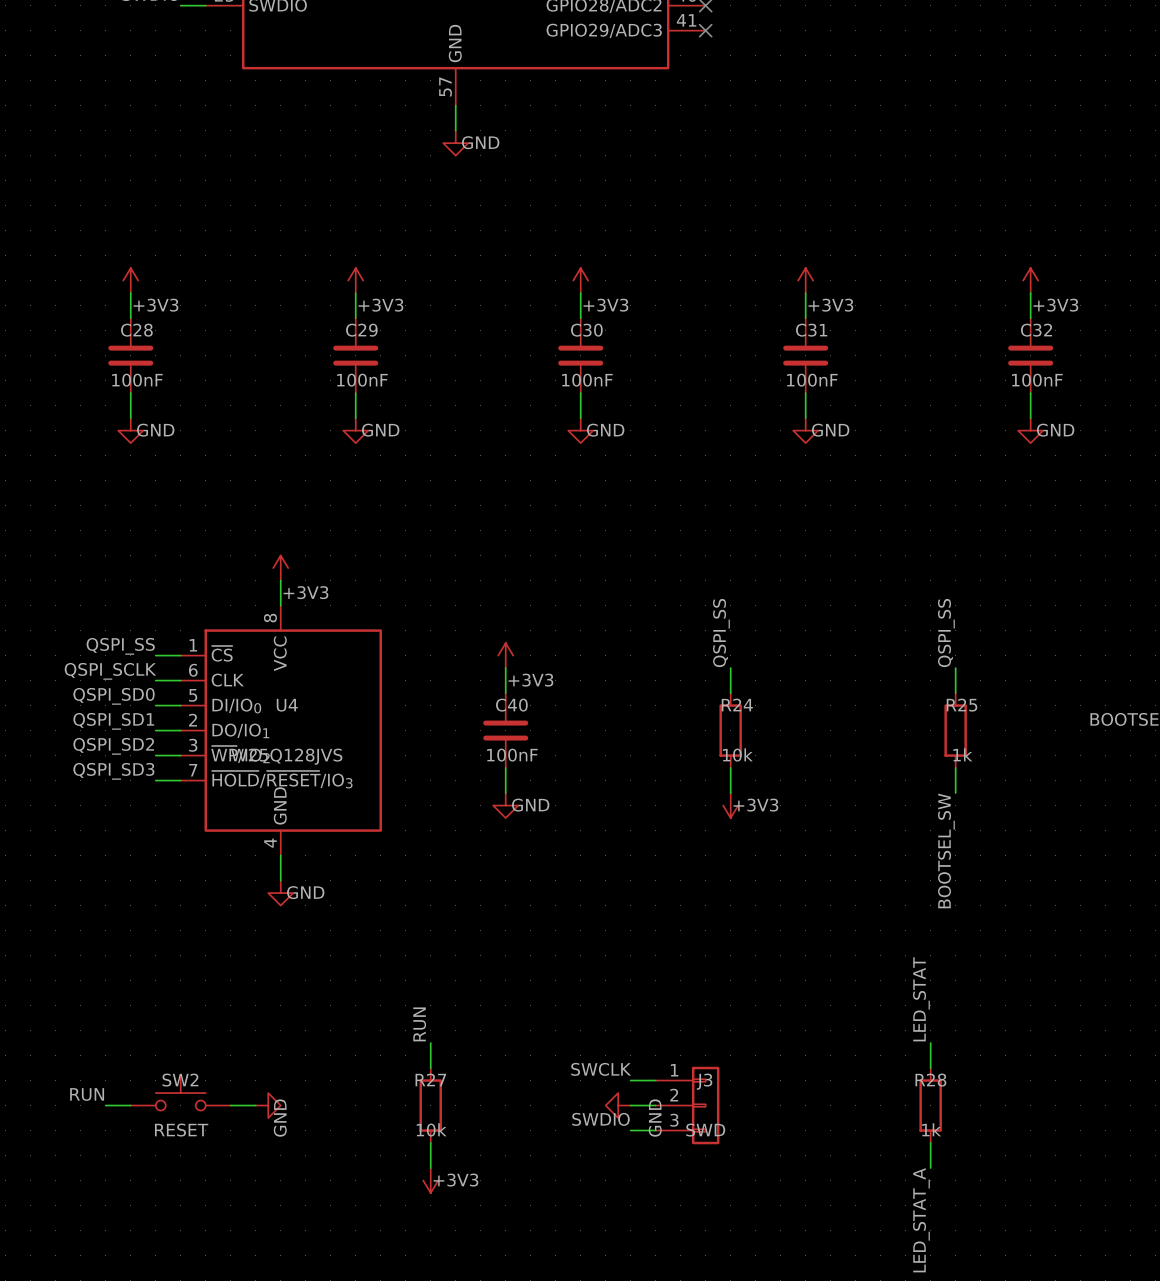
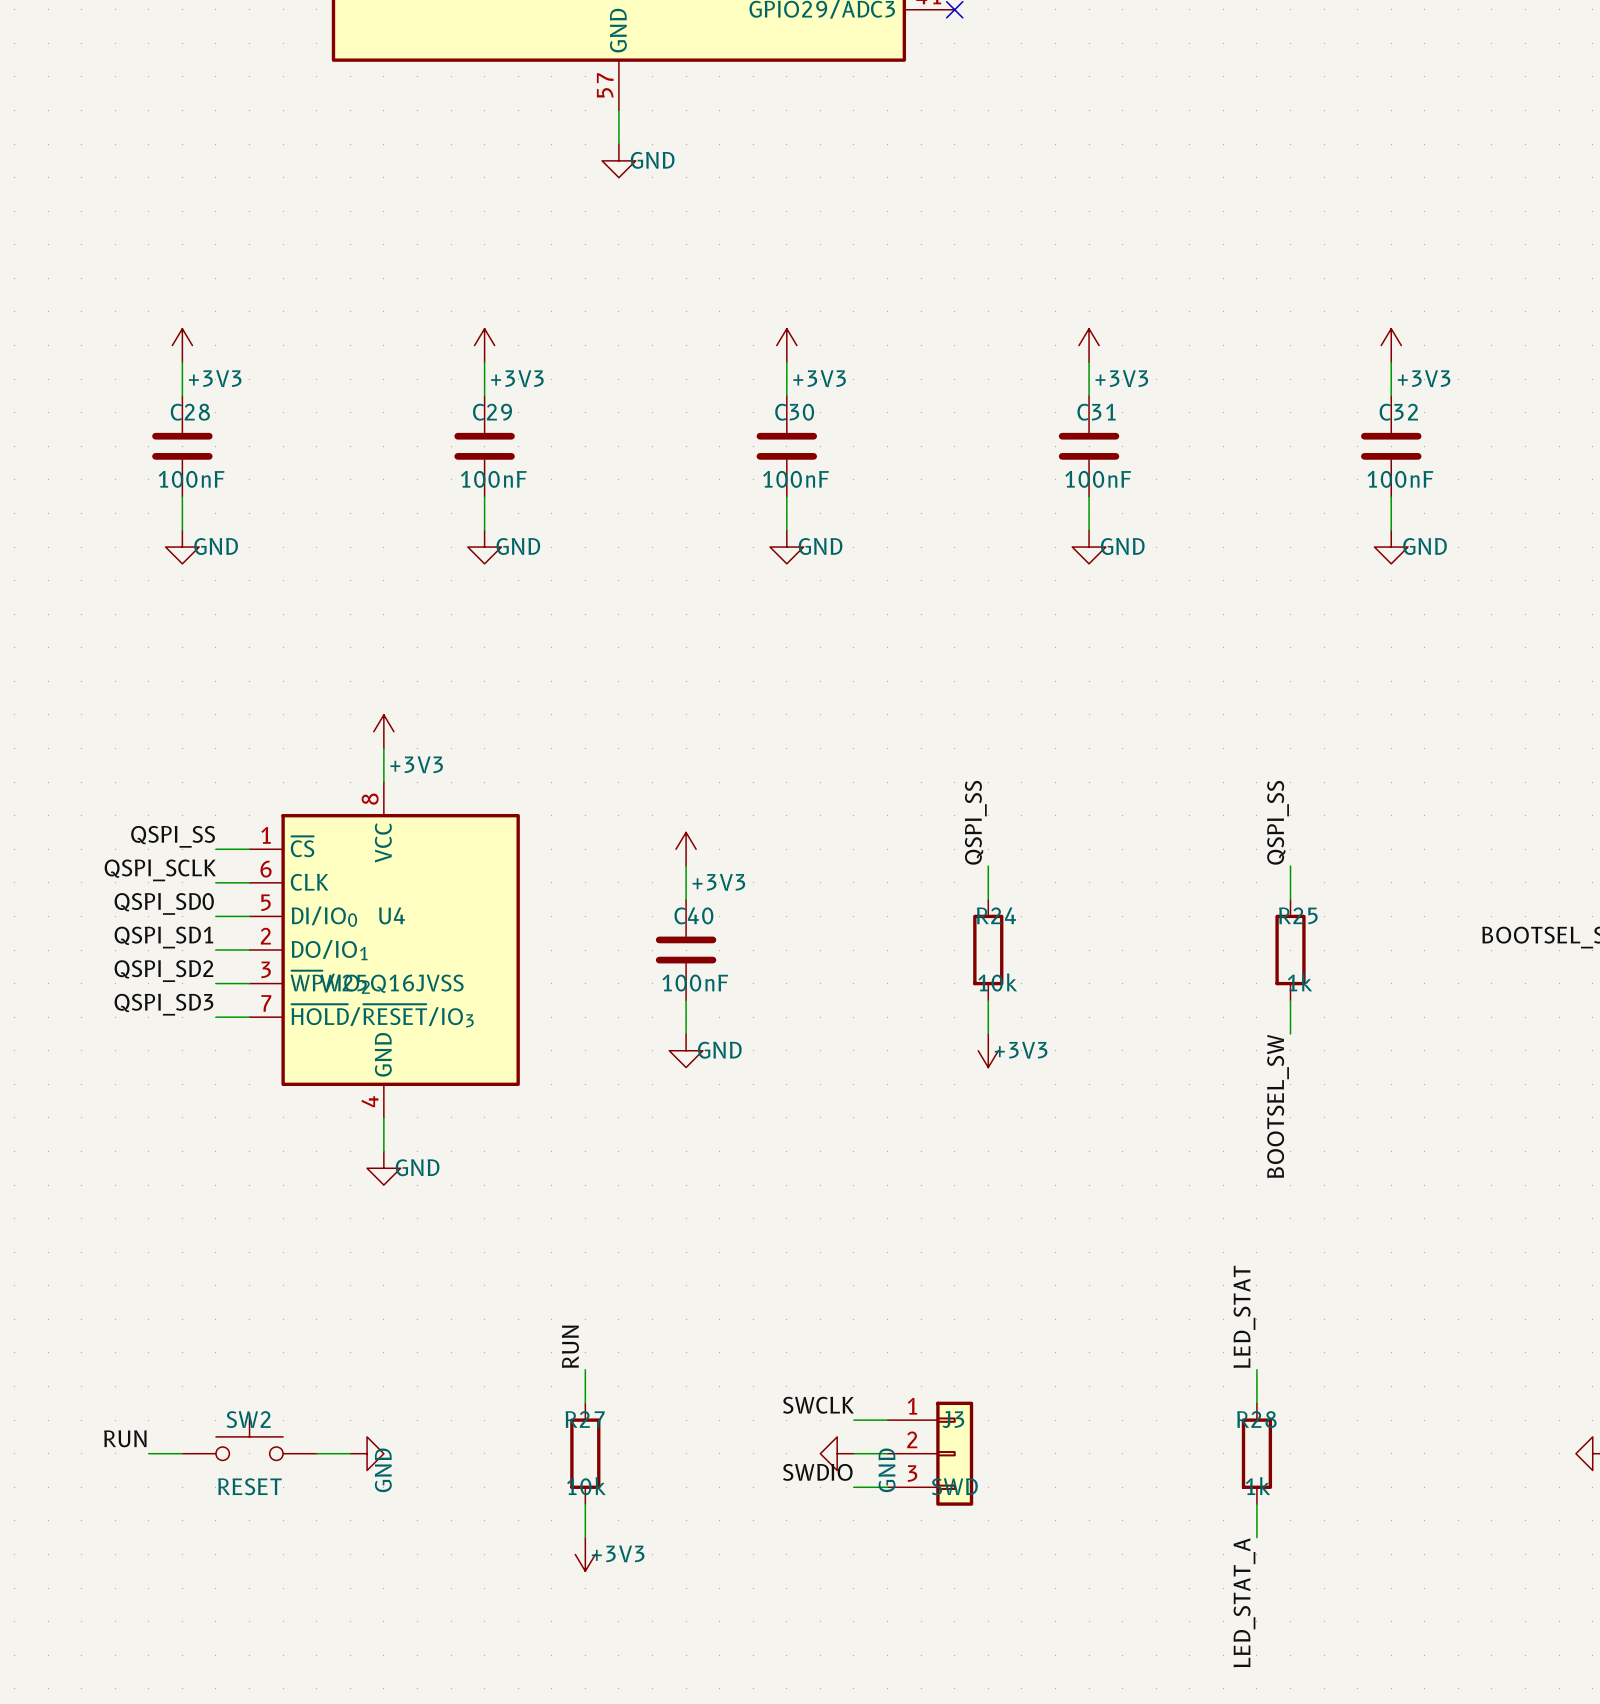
U4 value: W25Q128JVS (286, 756) -> W25Q16JVSS (392, 983)

